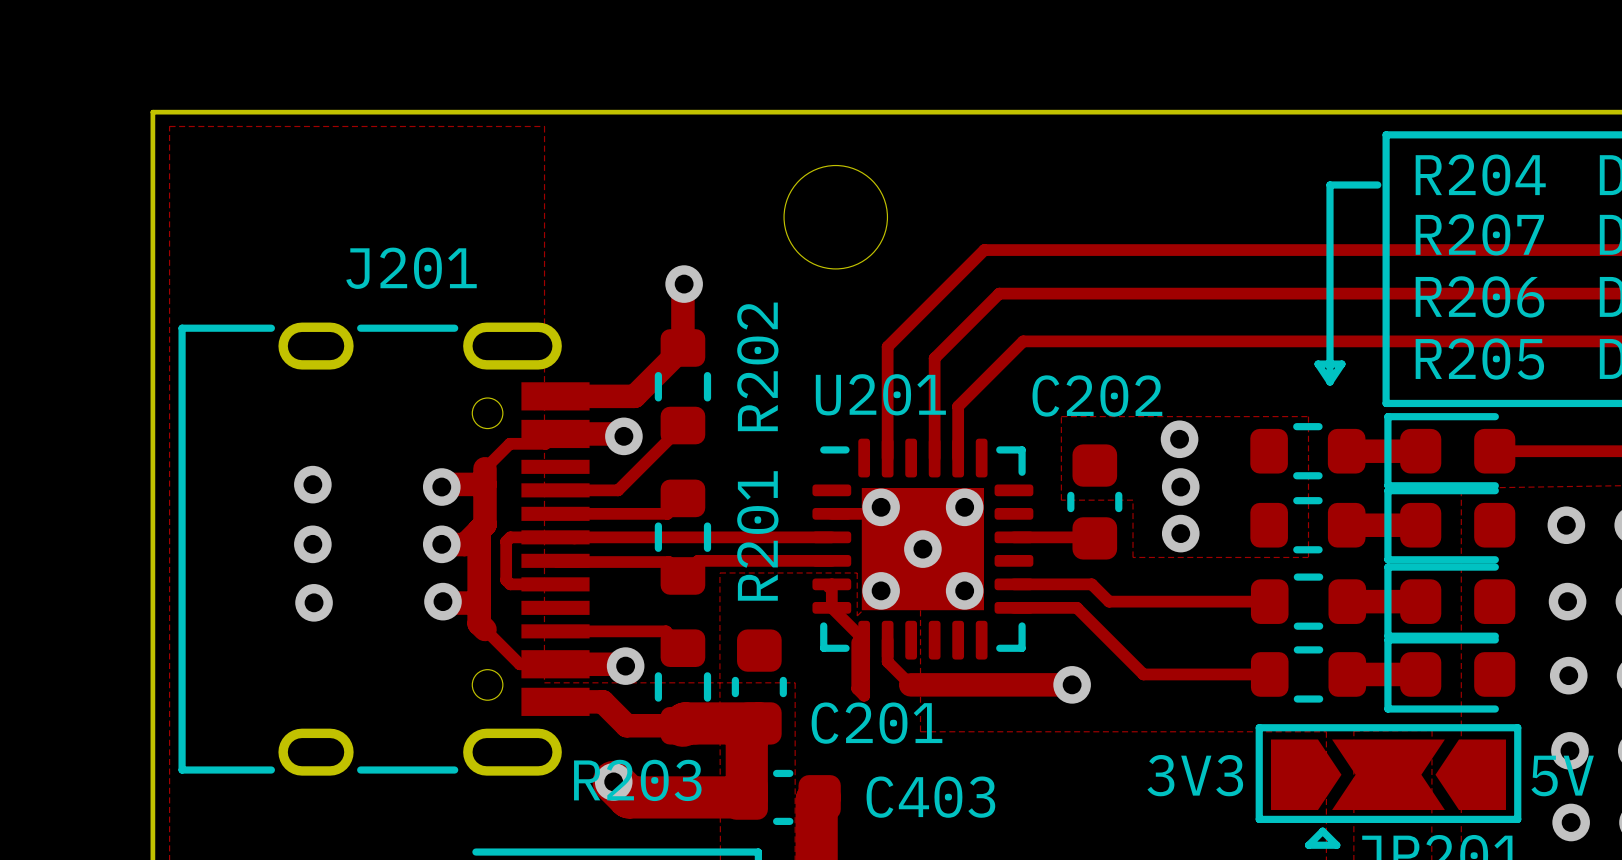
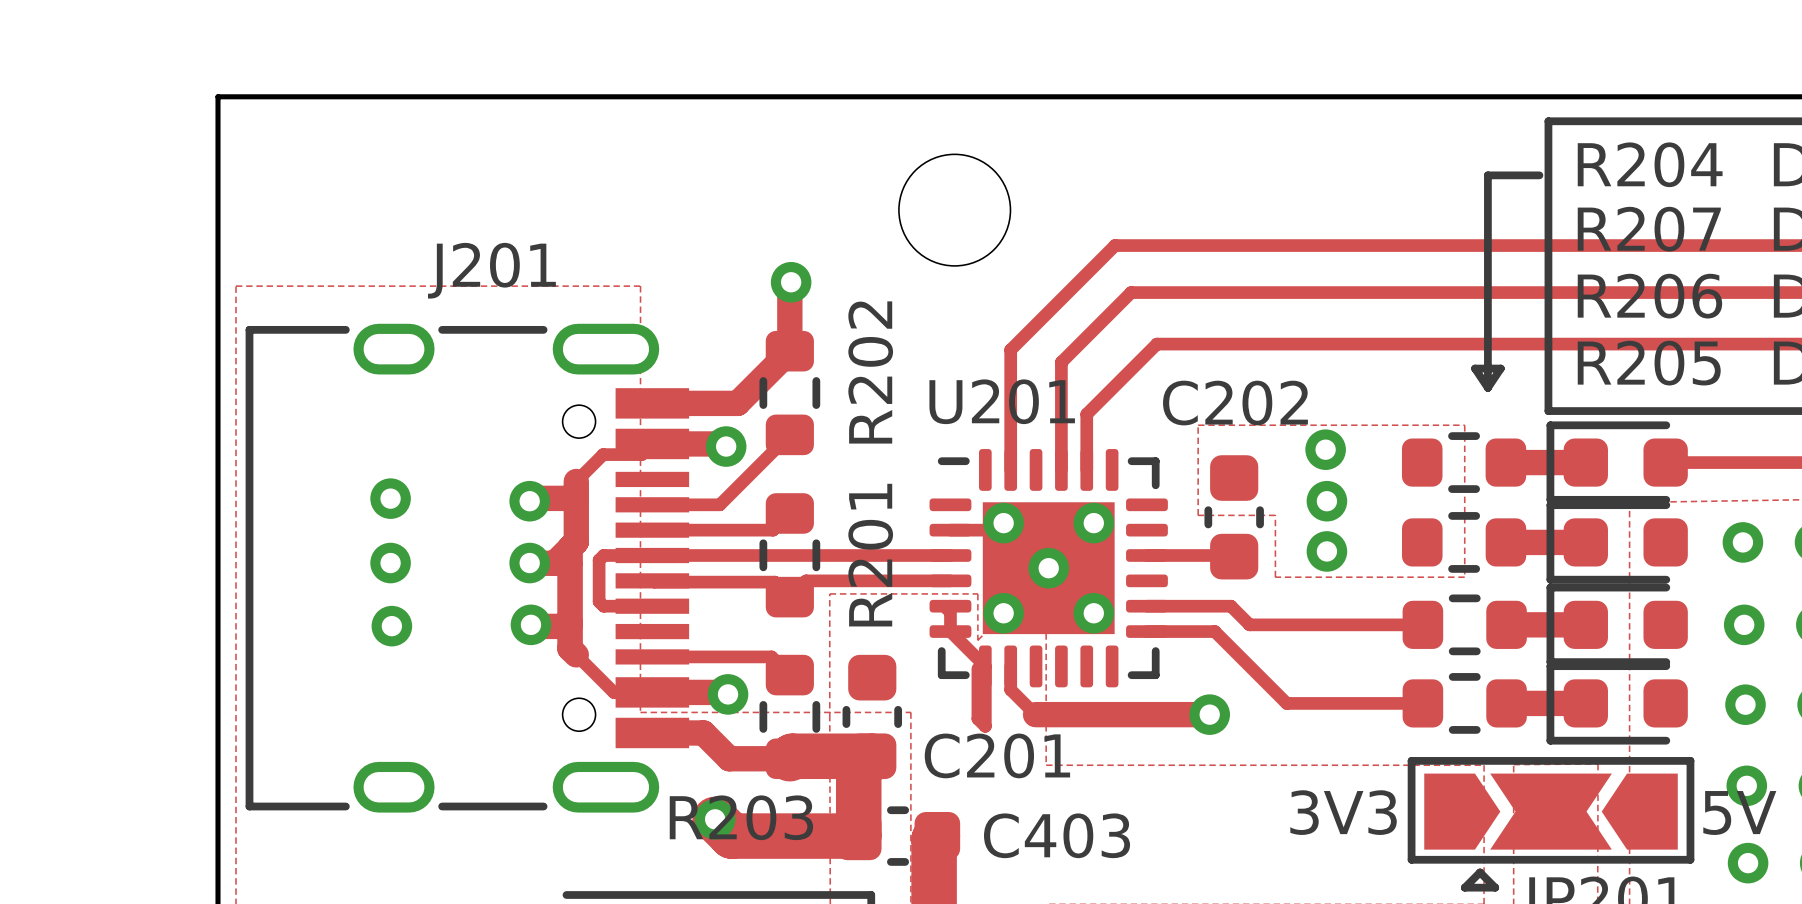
top zone outline: (169, 287) (169, 126) (544, 126) (544, 682) -> (235, 286) (640, 286) (640, 712)

